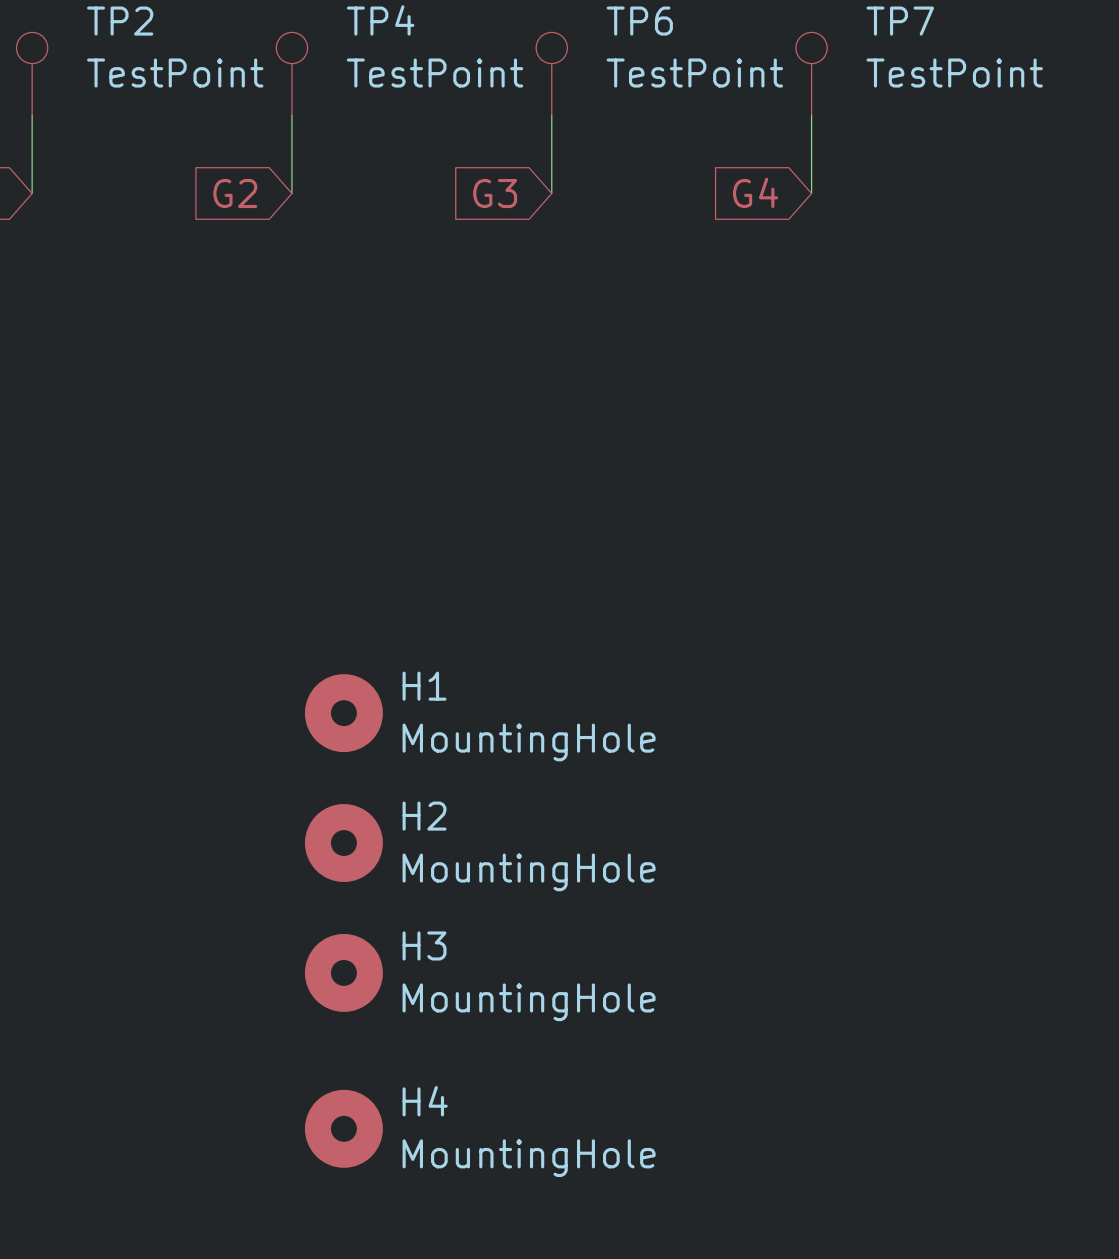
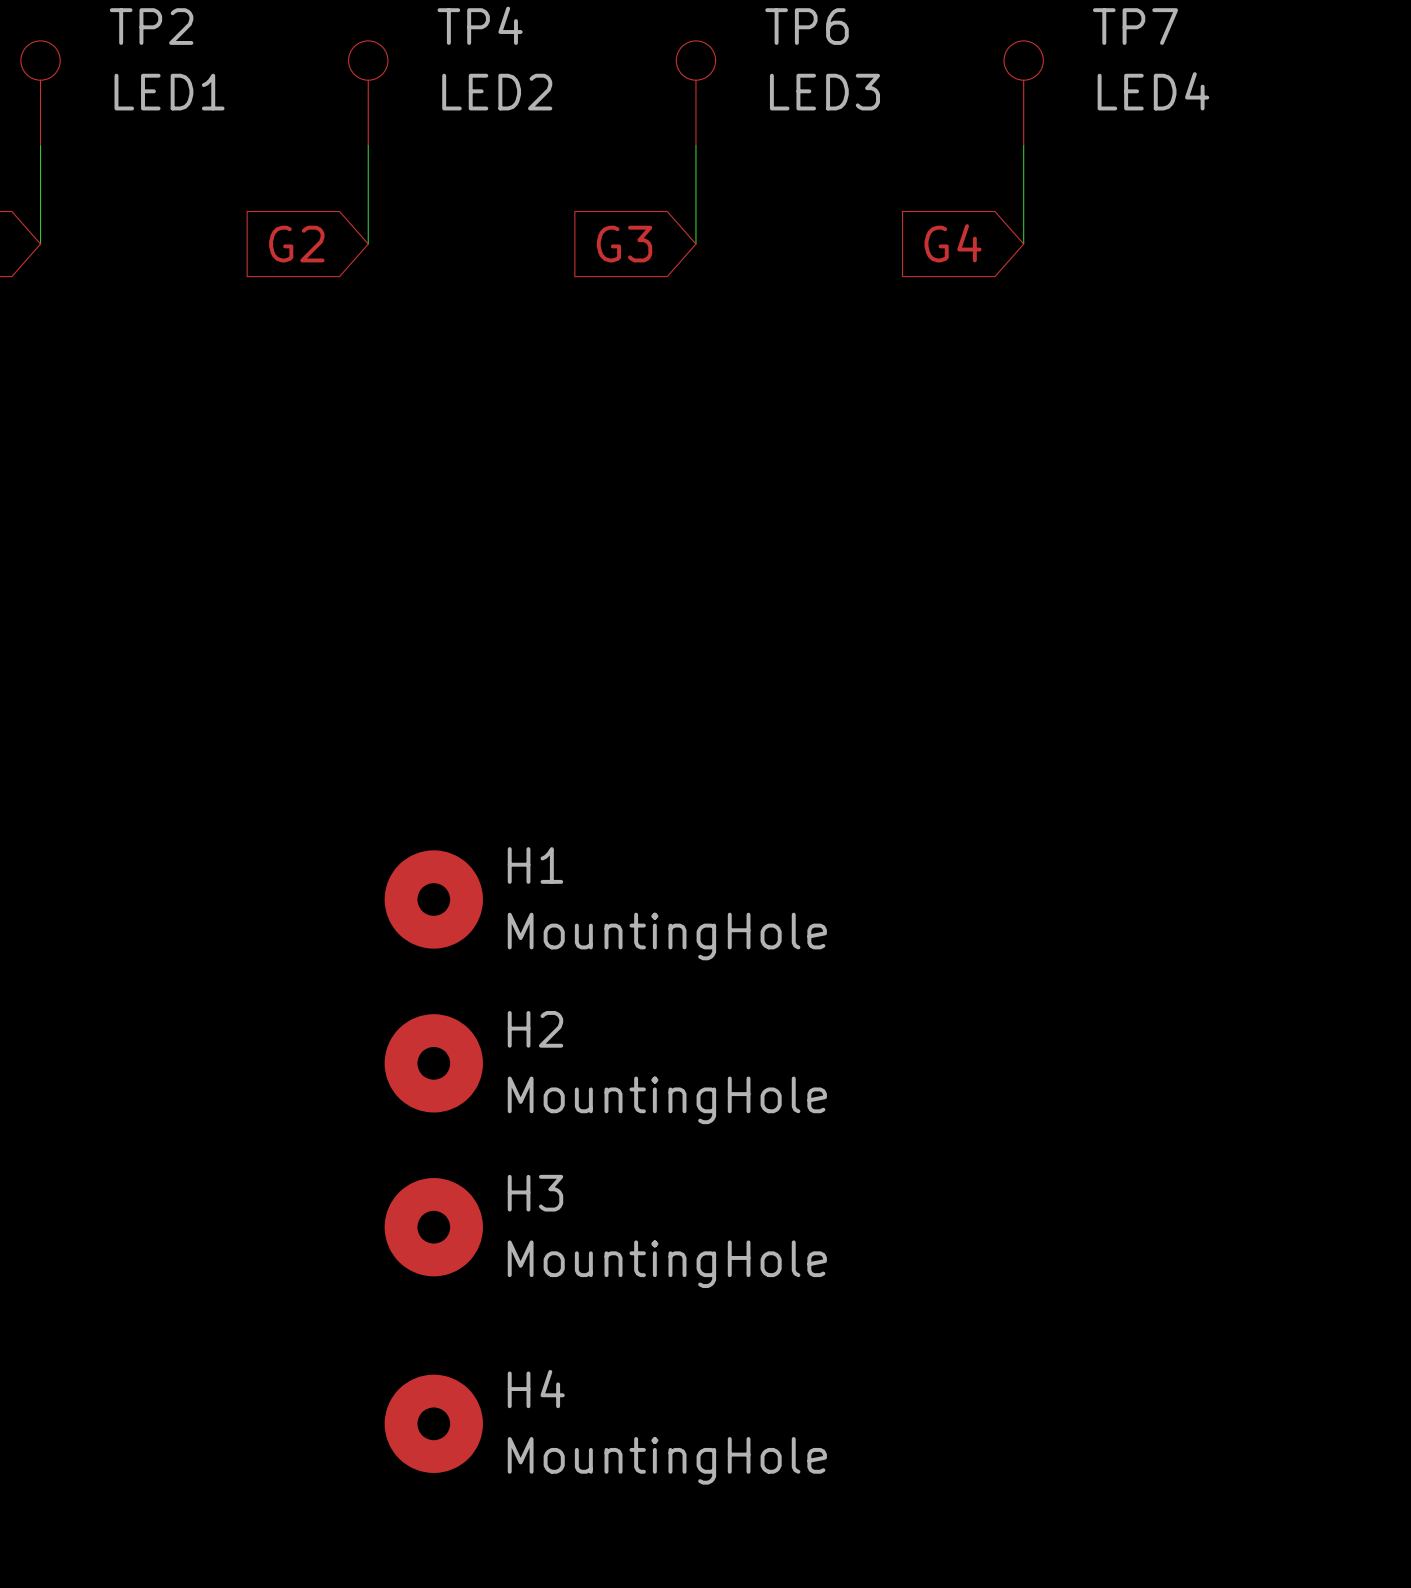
TP2 value: TestPoint (175, 73) -> LED1 (169, 92)
TP4 value: TestPoint (435, 73) -> LED2 (497, 92)
TP6 value: TestPoint (694, 73) -> LED3 (824, 92)
TP7 value: TestPoint (954, 73) -> LED4 (1153, 91)

